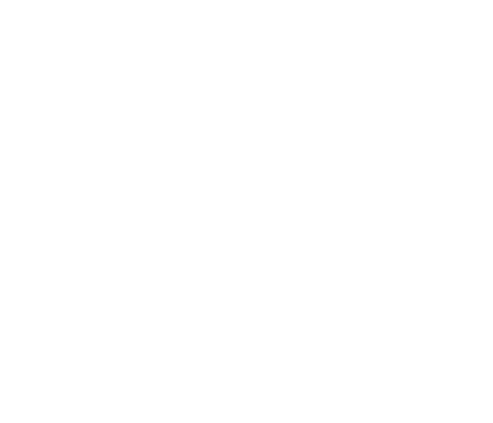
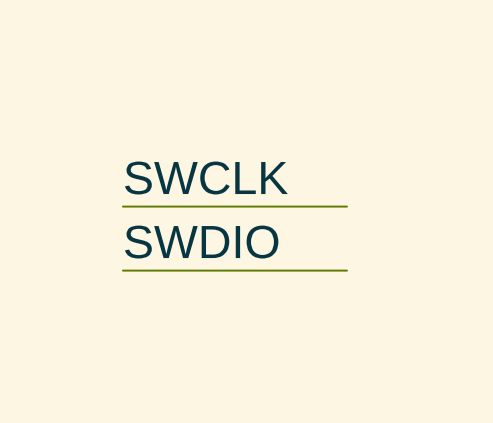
label: none -> SWCLK (206, 178)
wire: none -> (122, 206) (346, 206)
label: none -> SWDIO (201, 242)
wire: none -> (122, 270) (346, 270)

